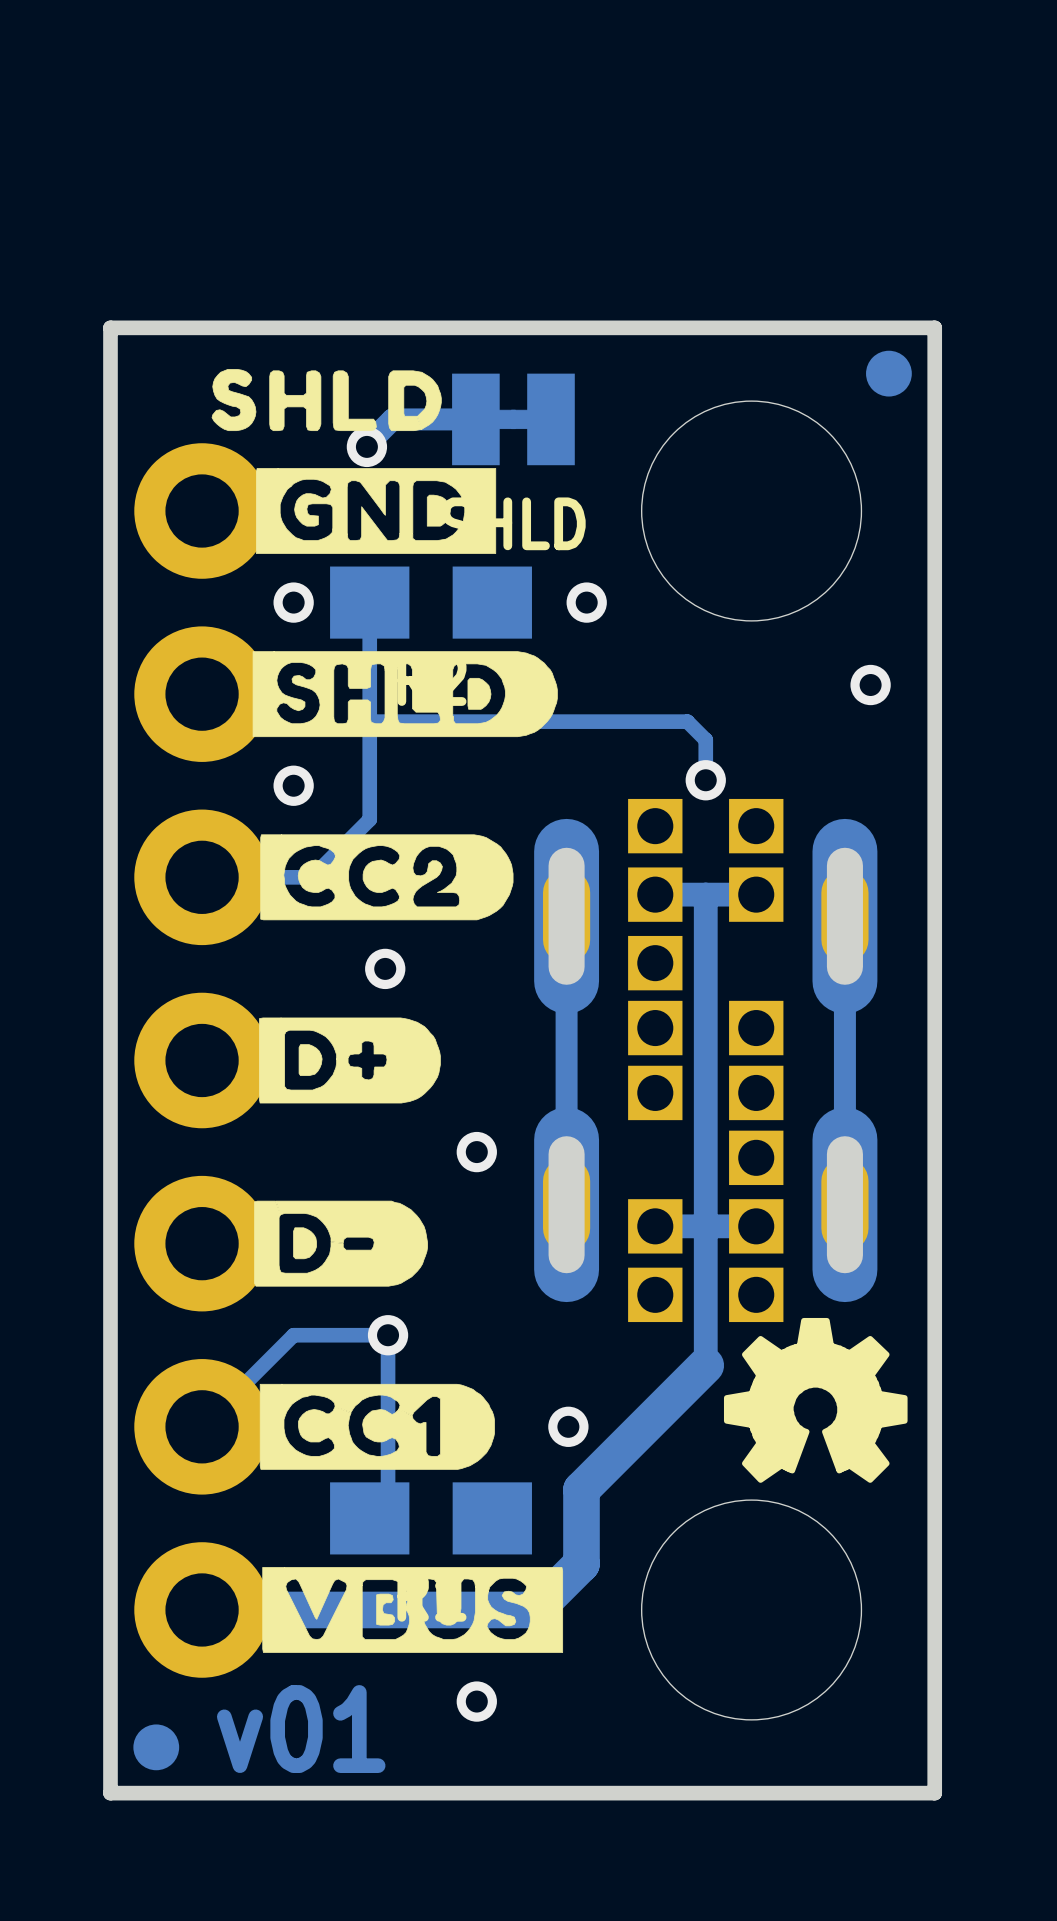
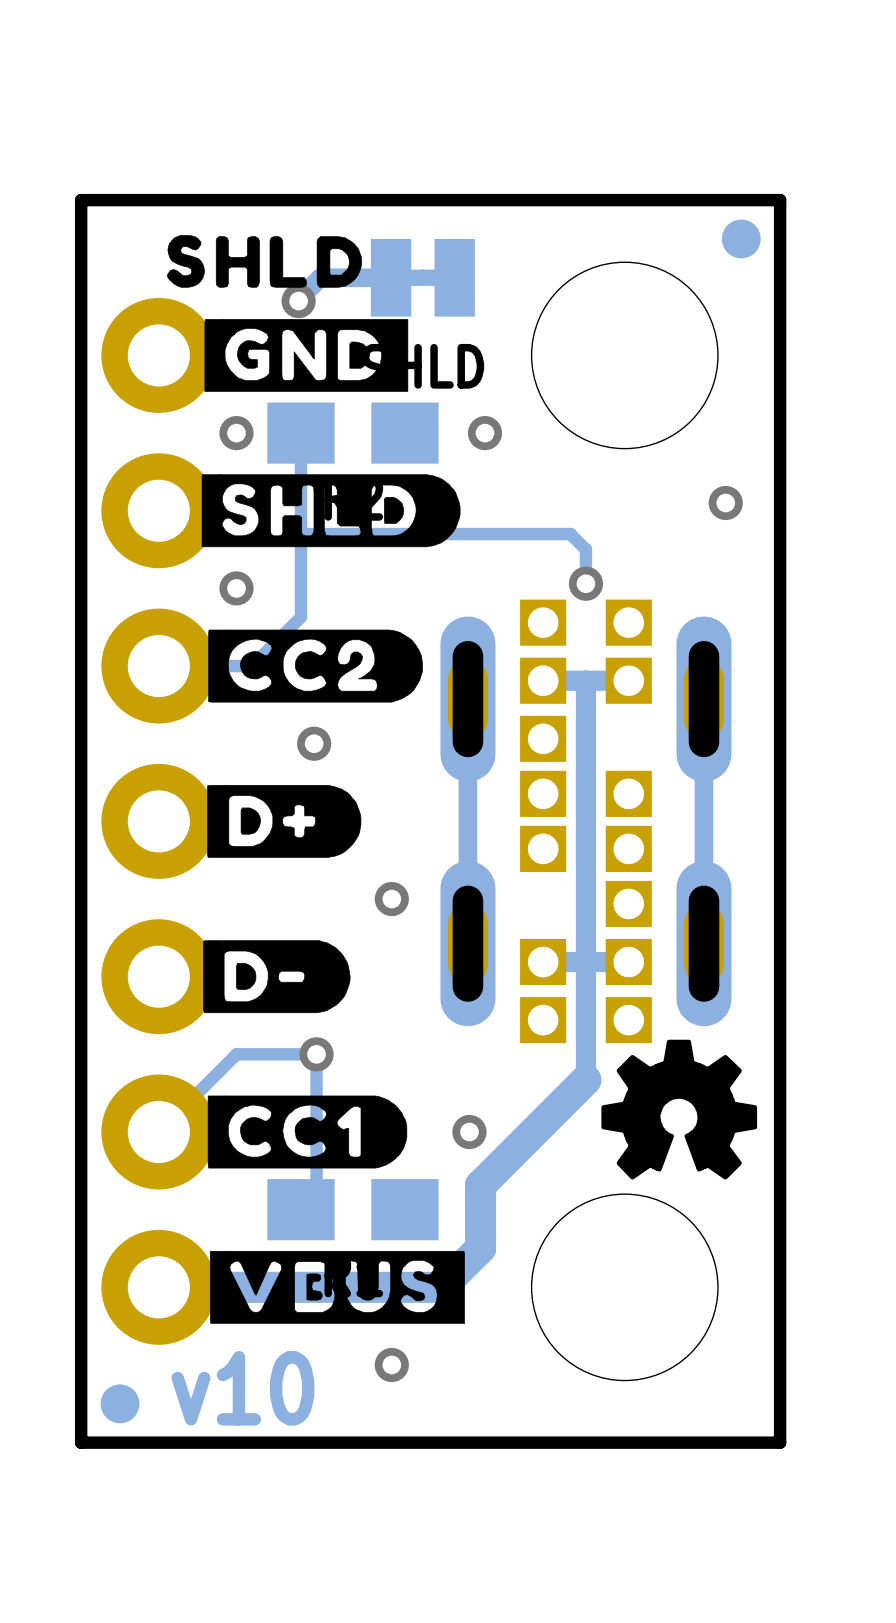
text: v01 (301, 1729) -> v10 (242, 1388)

